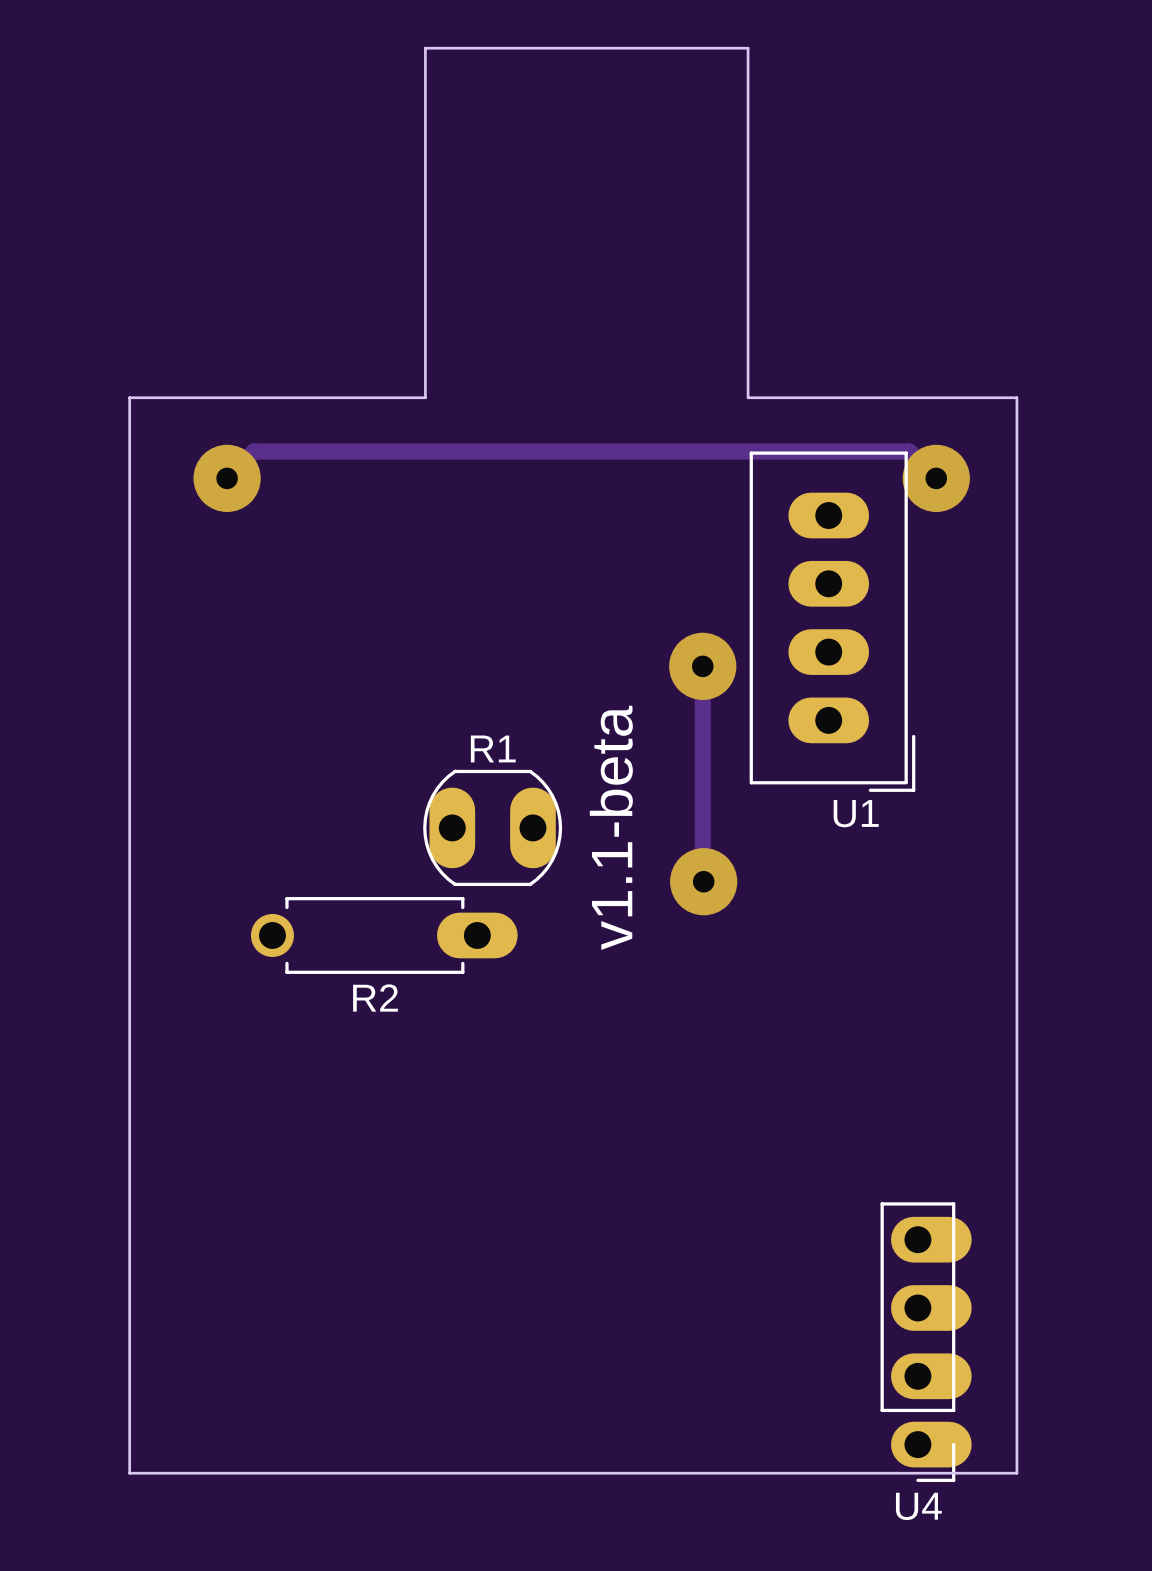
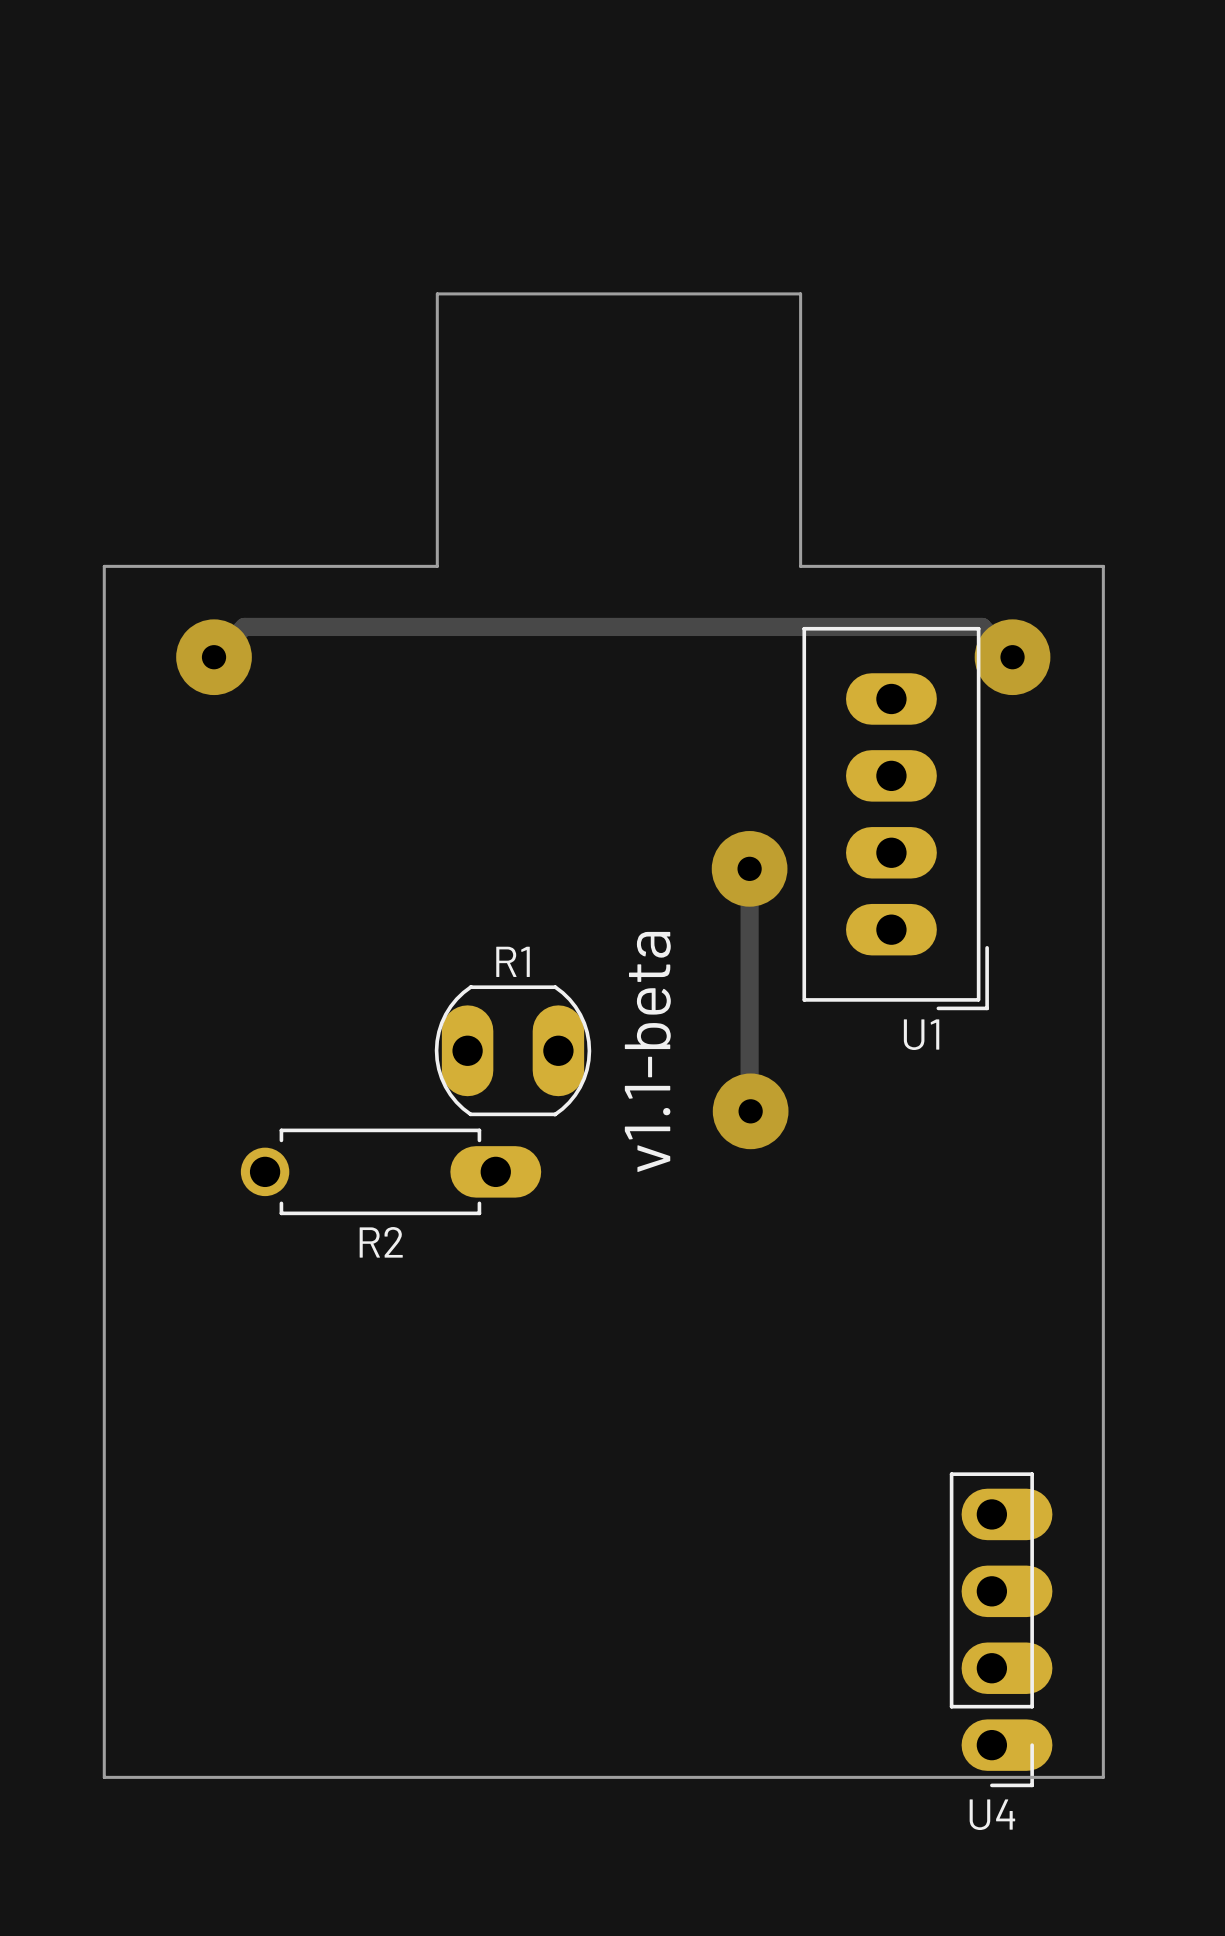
board edge: (425, 155) (425, 48) (748, 48) (748, 155) -> (437, 293) (800, 293)

